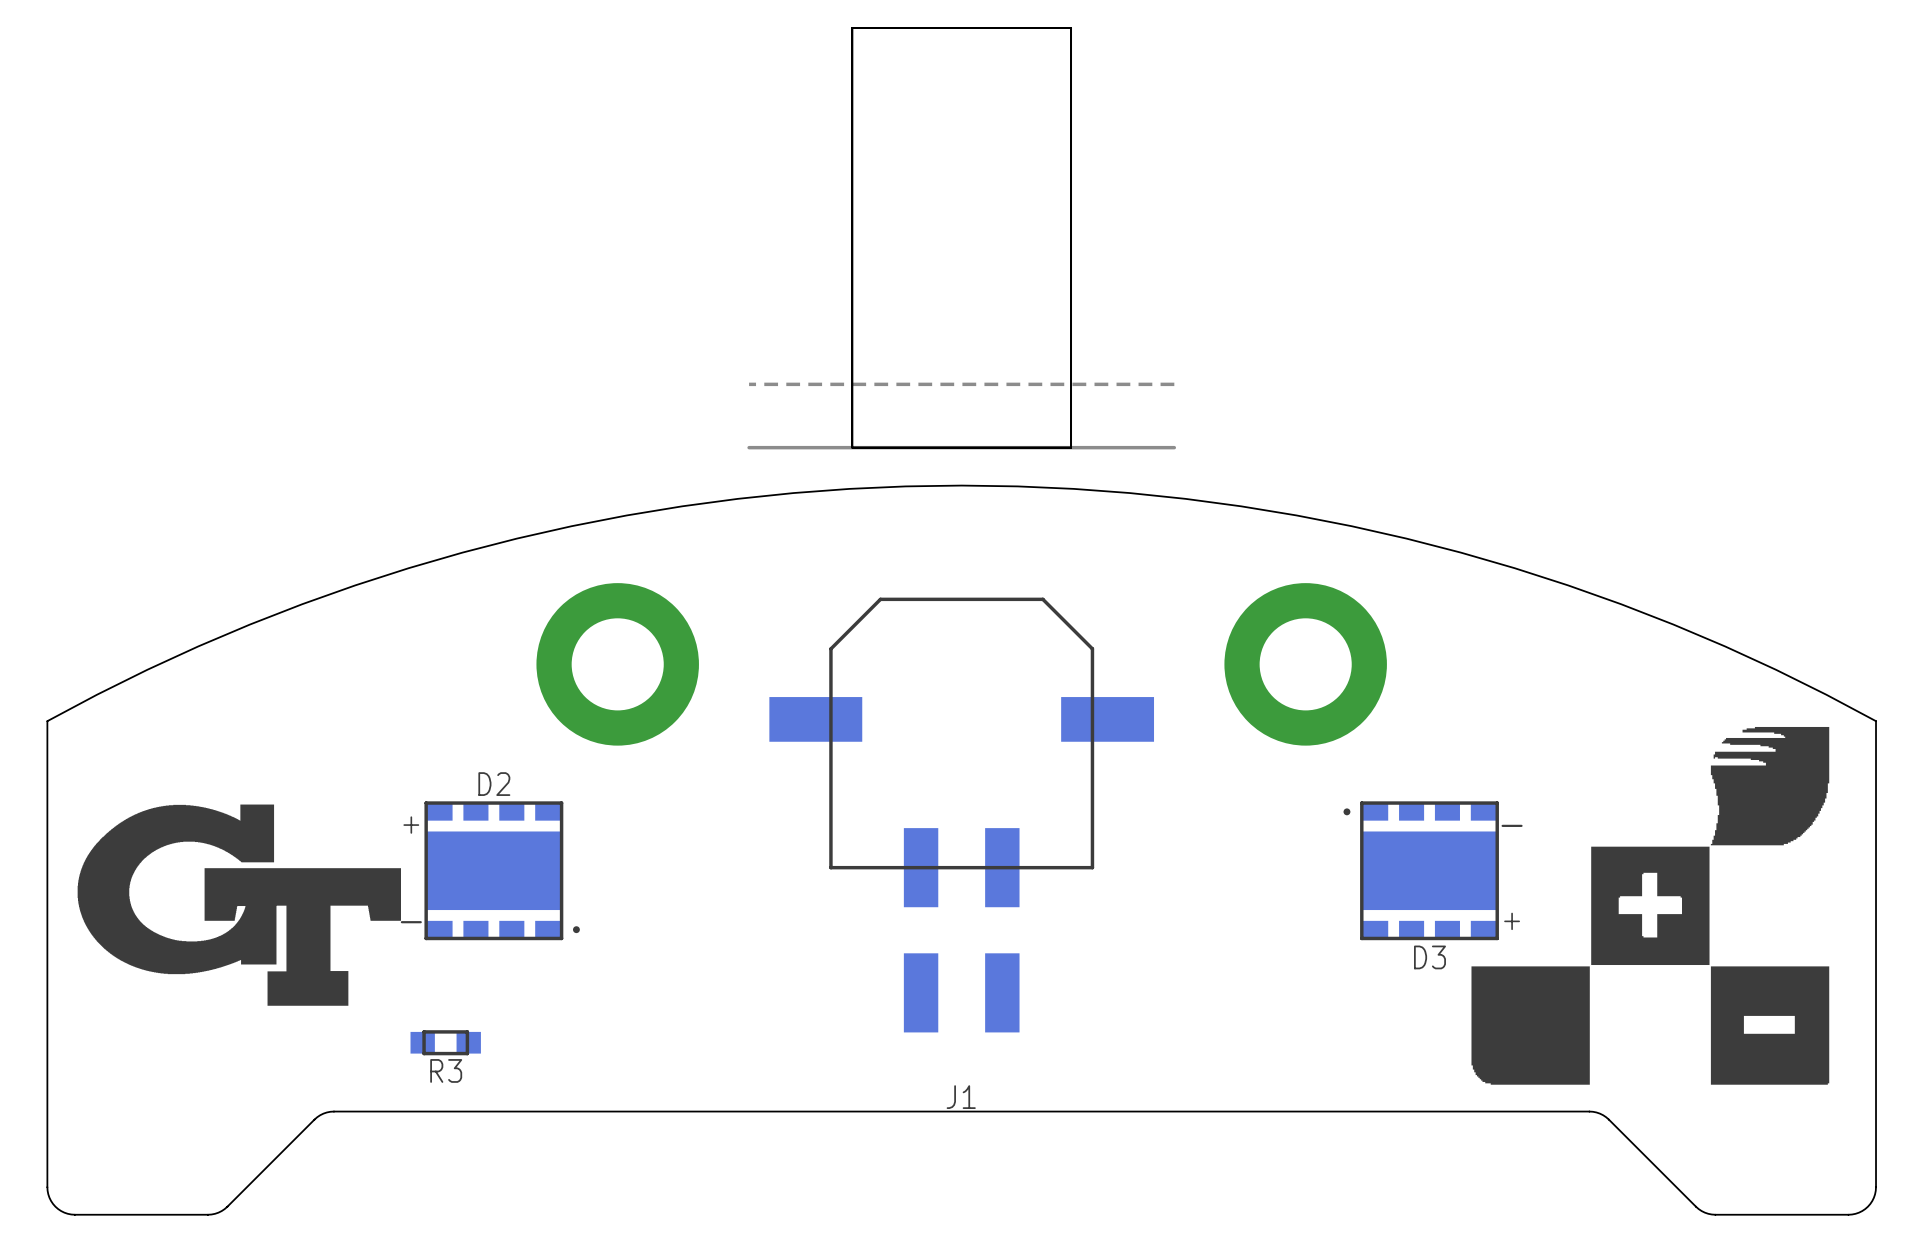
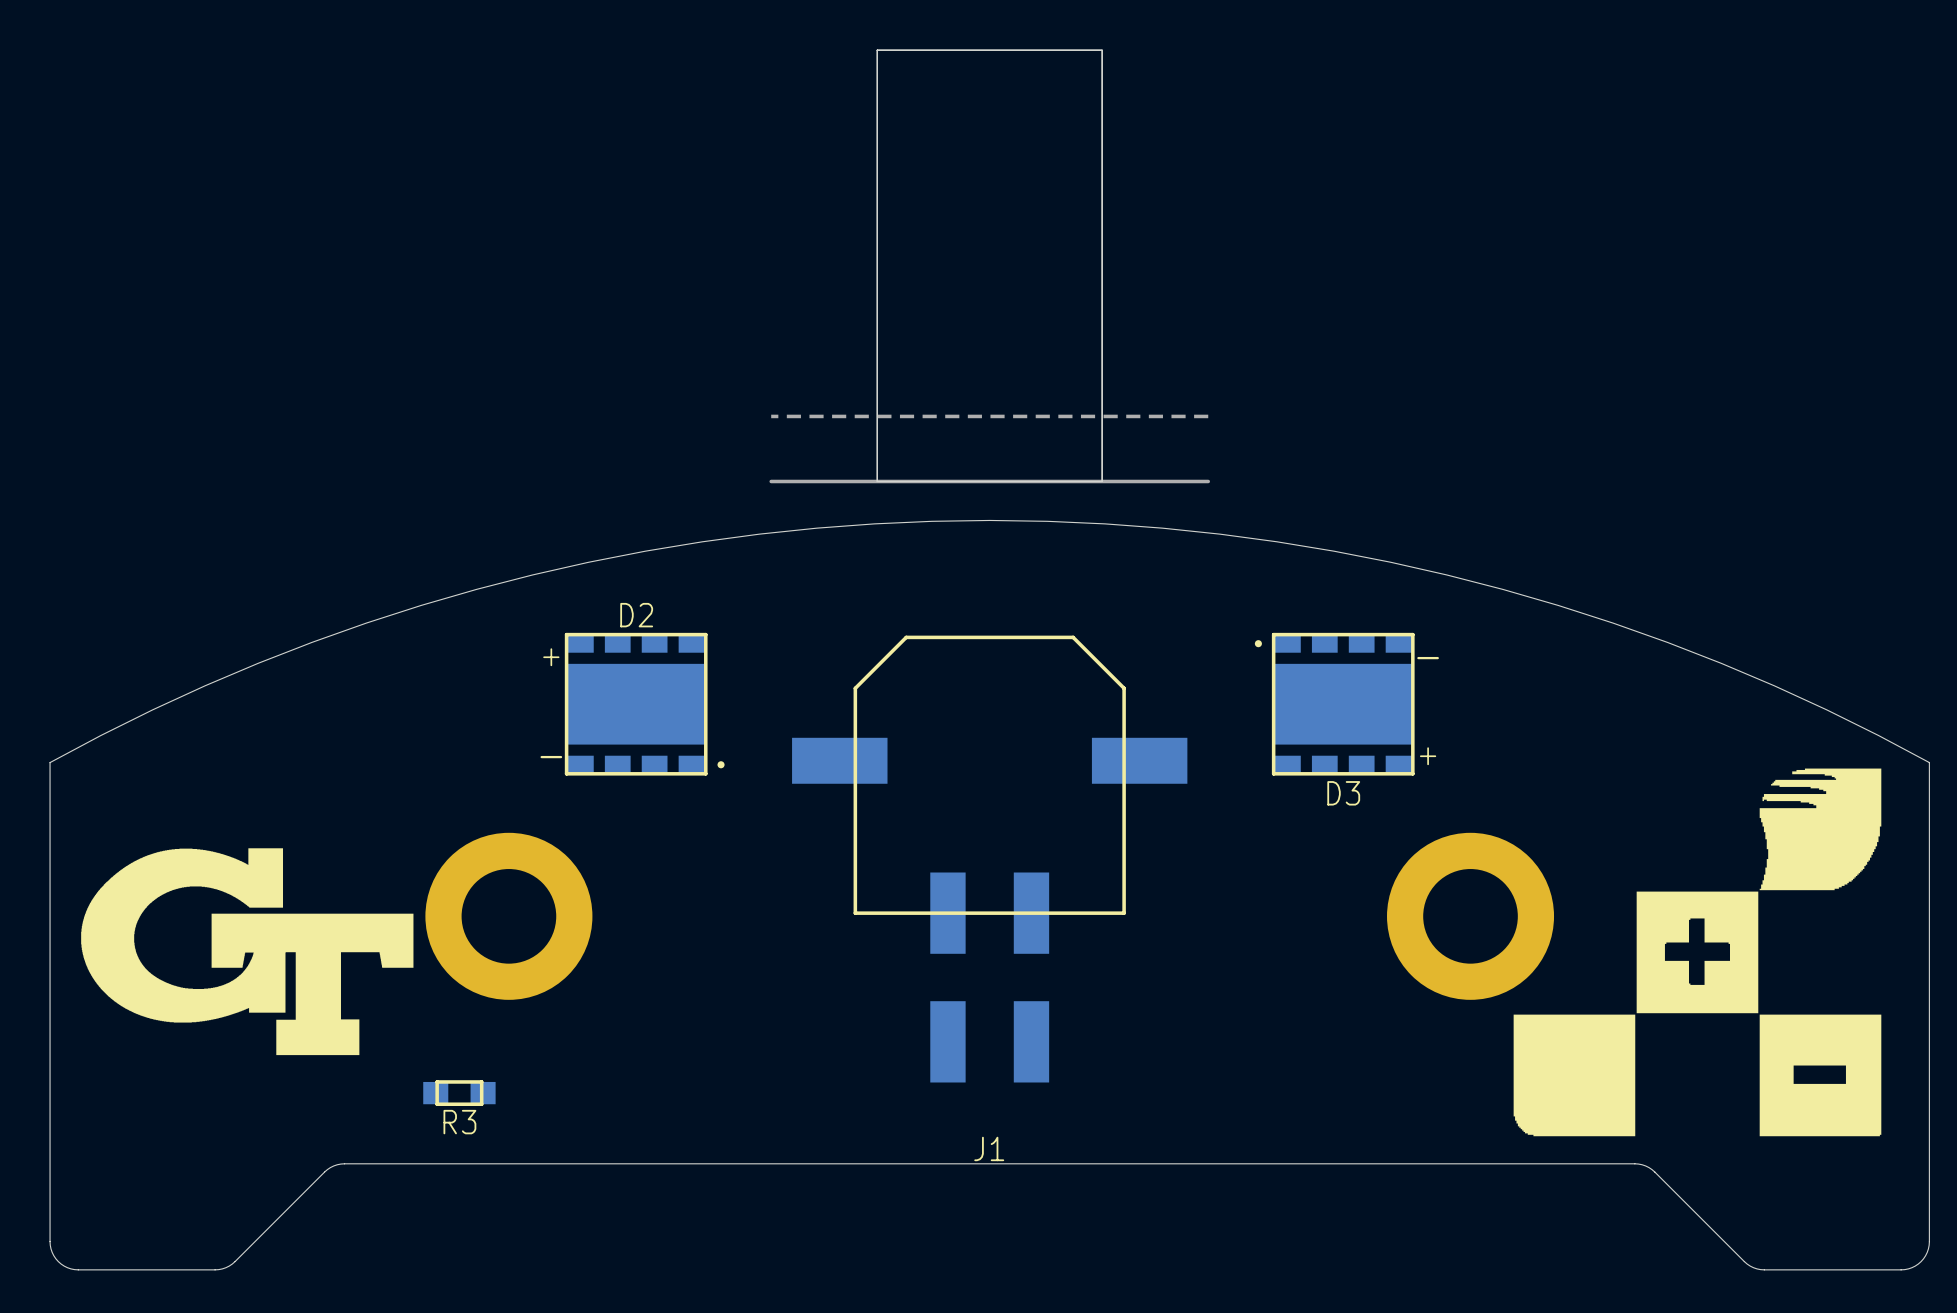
part position: (617, 664) -> (508, 916)
part position: (1305, 664) -> (1470, 916)
D2 position: (502, 870) -> (644, 704)
D3 position: (1421, 870) -> (1334, 704)

